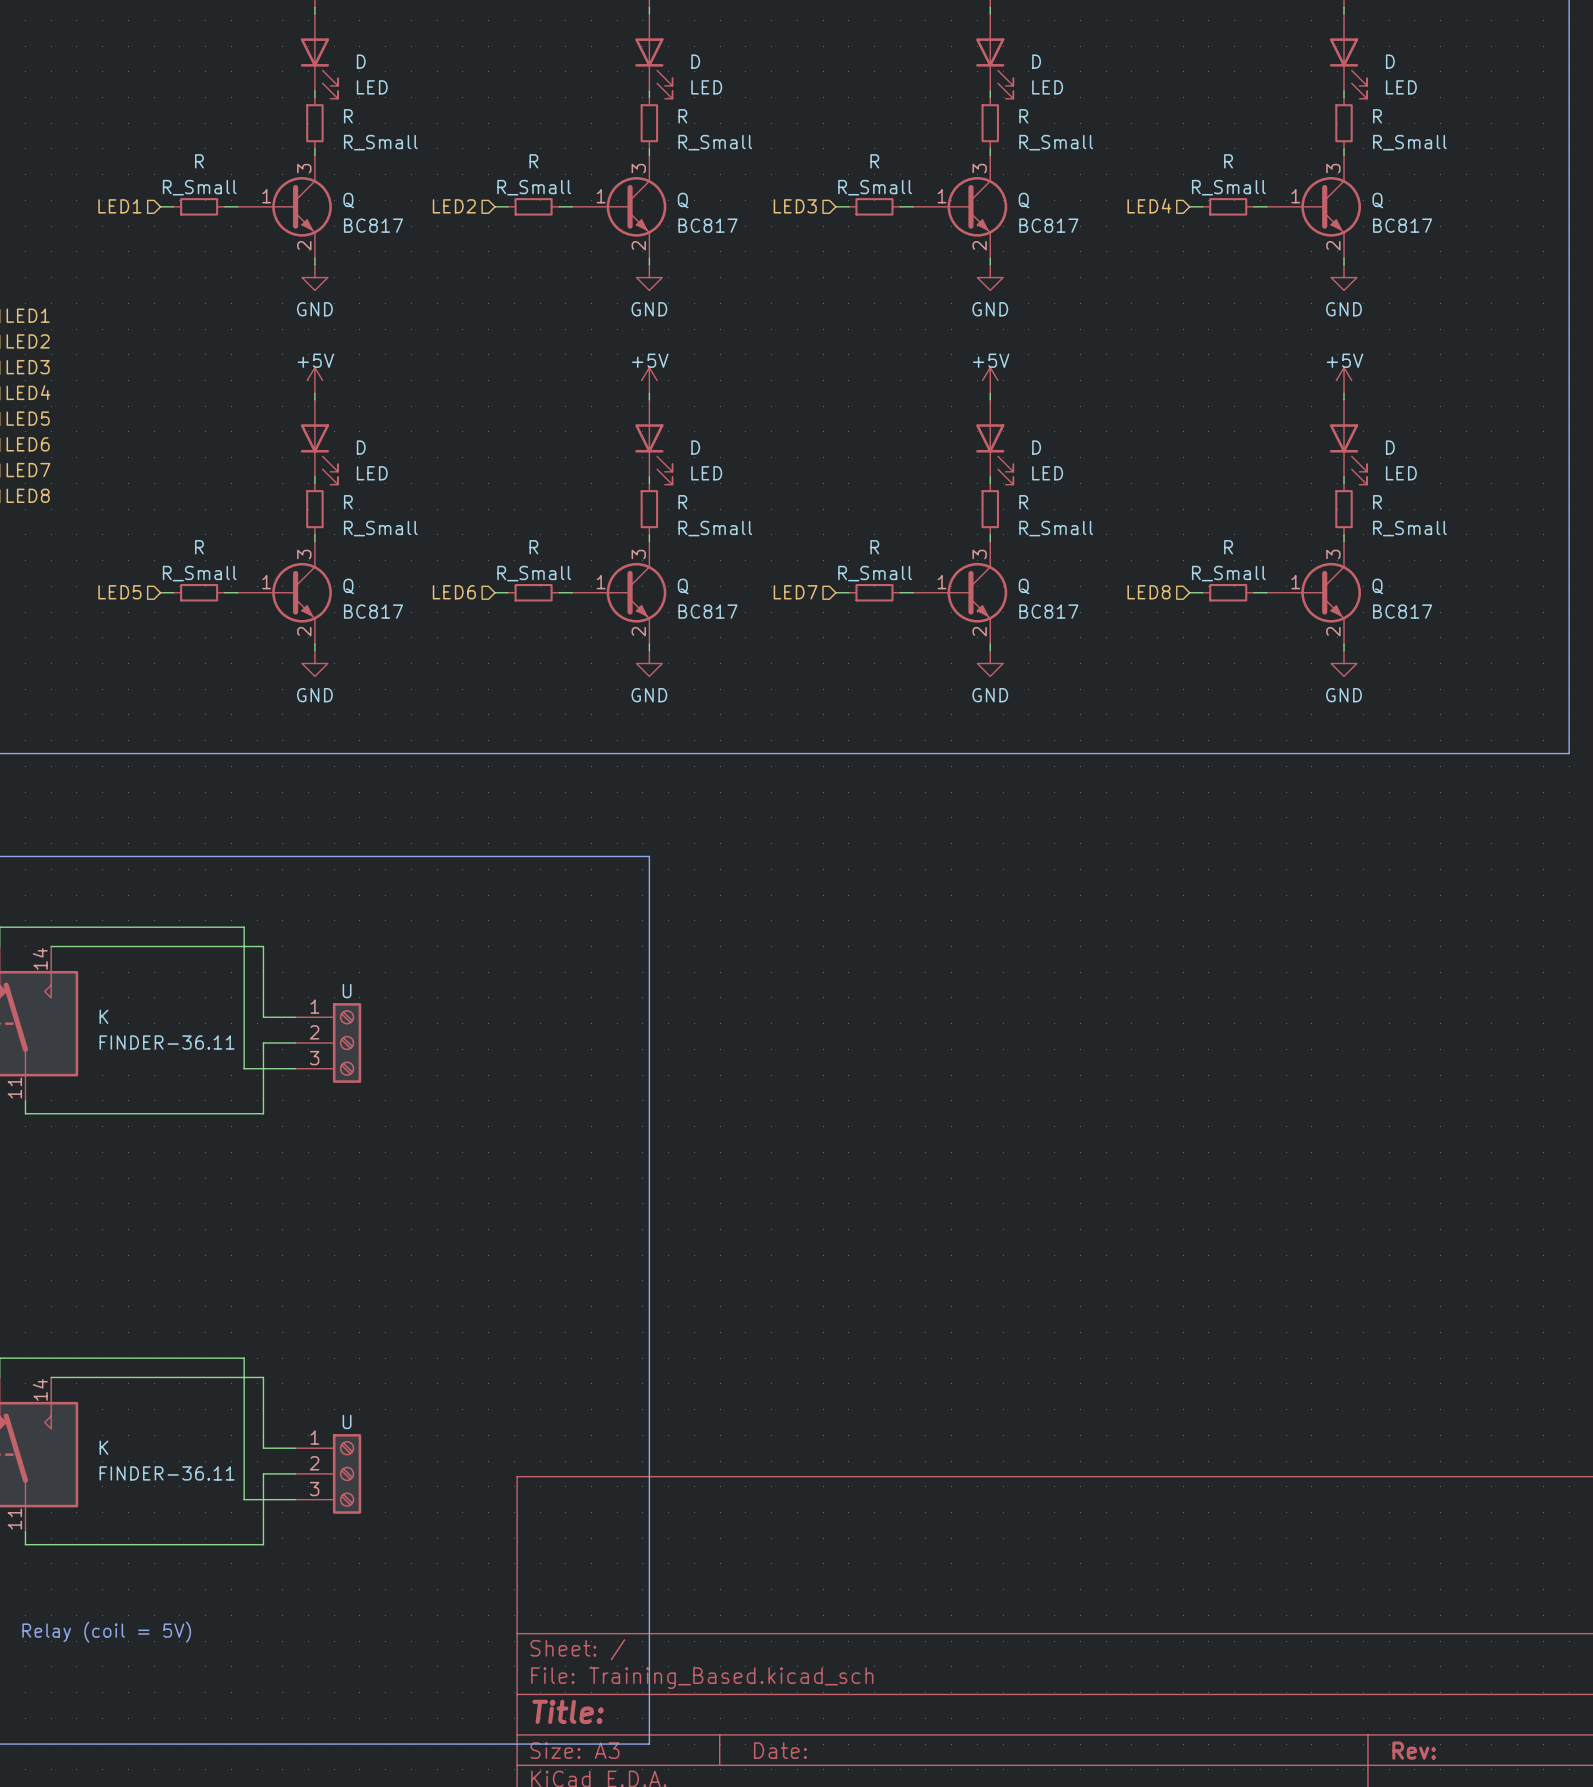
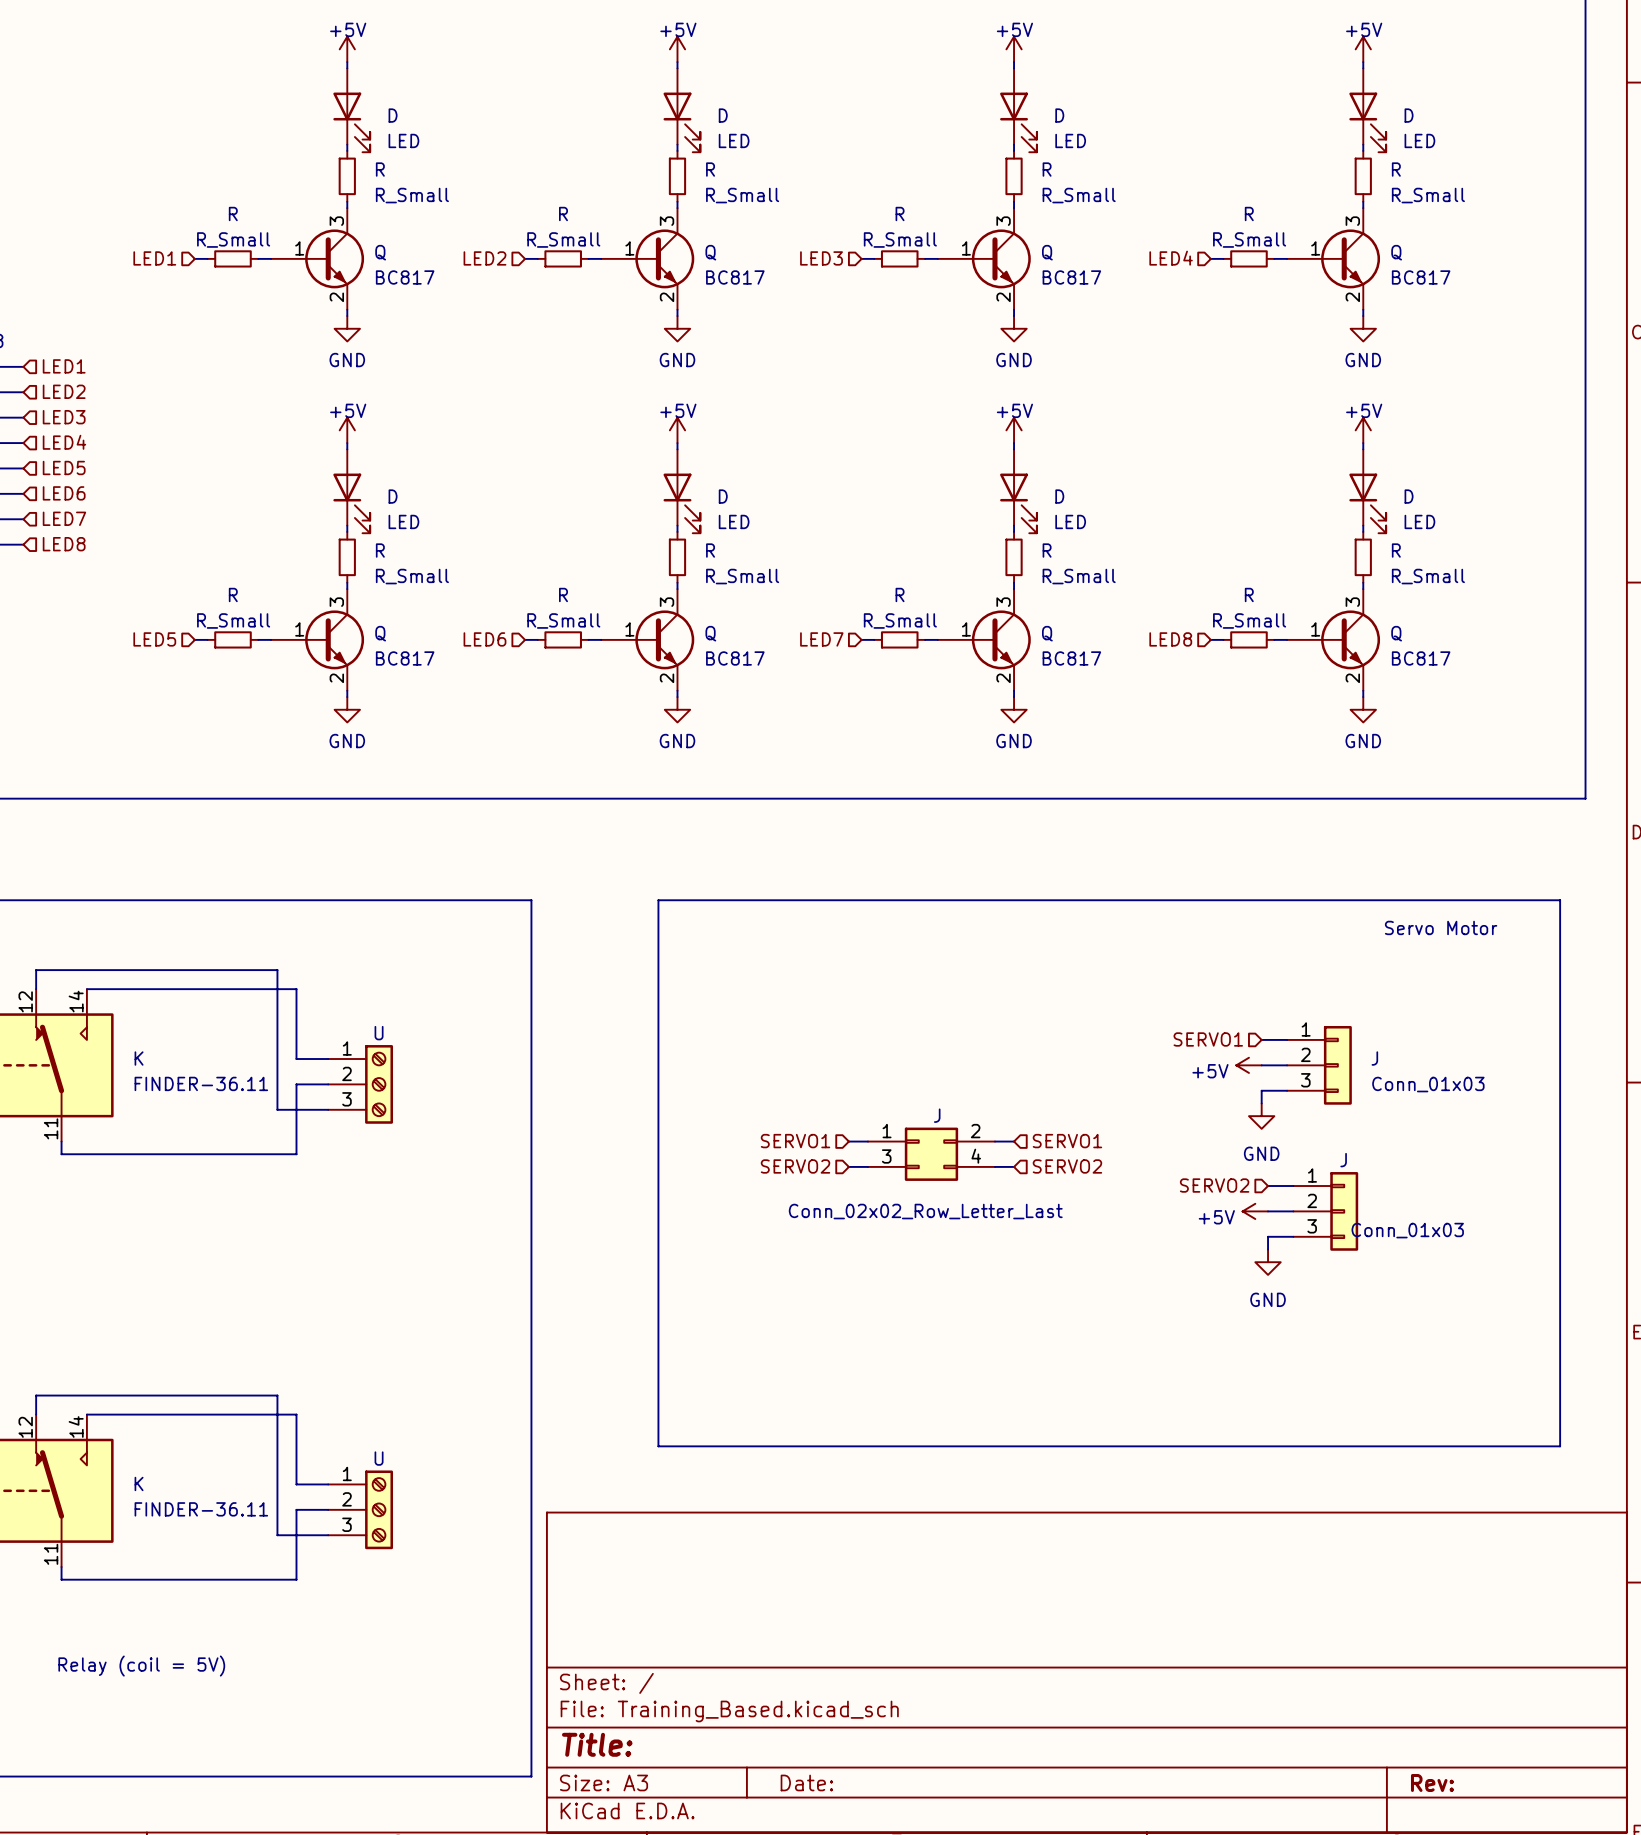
line: (501, 856) (630, 856) -> (677, 900) (1560, 900) (1560, 1446) (658, 1446) (658, 900)
line: (649, 856) (649, 1744) (501, 1744) -> (531, 900) (531, 1776)
text: none -> Servo Motor (1441, 927)
hierarchical label: none -> SERVO1 (1208, 1039)
wire: none -> (1261, 1039) (1287, 1039)
power symbol: none -> +5V (1248, 1065)
wire: none -> (1261, 1065) (1287, 1065)
J: none -> Conn_01x03 (1319, 1065)
wire: none -> (1287, 1090) (1261, 1090) (1261, 1103)
power symbol: none -> GND (1261, 1116)
hierarchical label: none -> SERVO1 (795, 1141)
wire: none -> (848, 1141) (867, 1141)
wire: none -> (994, 1141) (1014, 1141)
hierarchical label: none -> SERVO1 (1067, 1141)
J: none -> Conn_02x02_Row_Letter_Last (931, 1154)
hierarchical label: none -> SERVO2 (795, 1166)
wire: none -> (848, 1166) (867, 1166)
wire: none -> (994, 1166) (1014, 1166)
hierarchical label: none -> SERVO2 (1067, 1166)
hierarchical label: none -> SERVO2 (1214, 1185)
wire: none -> (1268, 1186) (1293, 1186)
power symbol: none -> +5V (1255, 1211)
wire: none -> (1268, 1211) (1293, 1211)
J: none -> Conn_01x03 (1325, 1211)
wire: none -> (1293, 1236) (1268, 1236) (1268, 1249)
power symbol: none -> GND (1268, 1262)

